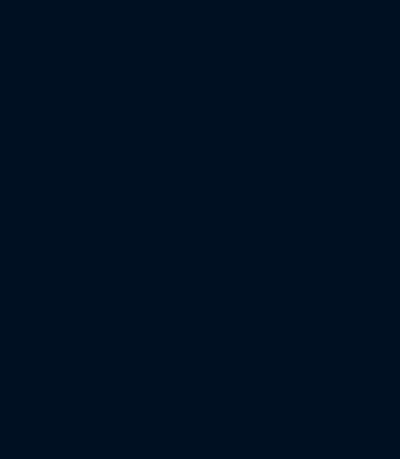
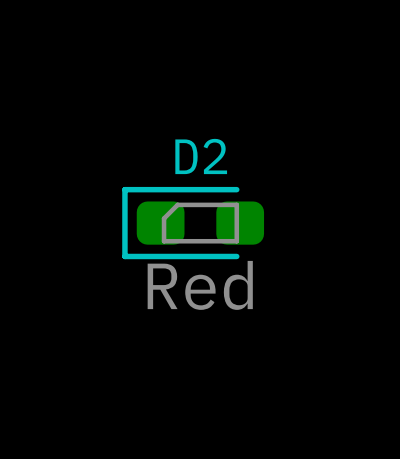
D2: none -> Red (193, 223)

